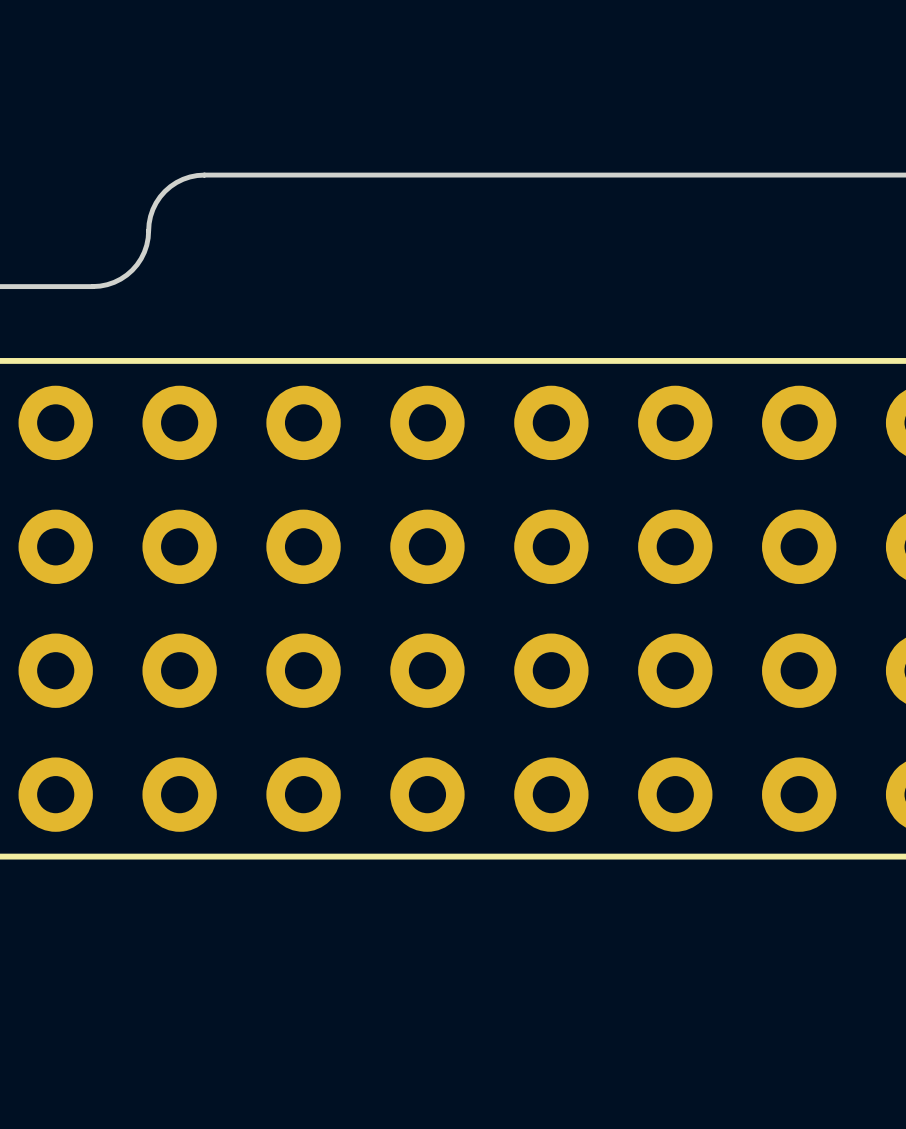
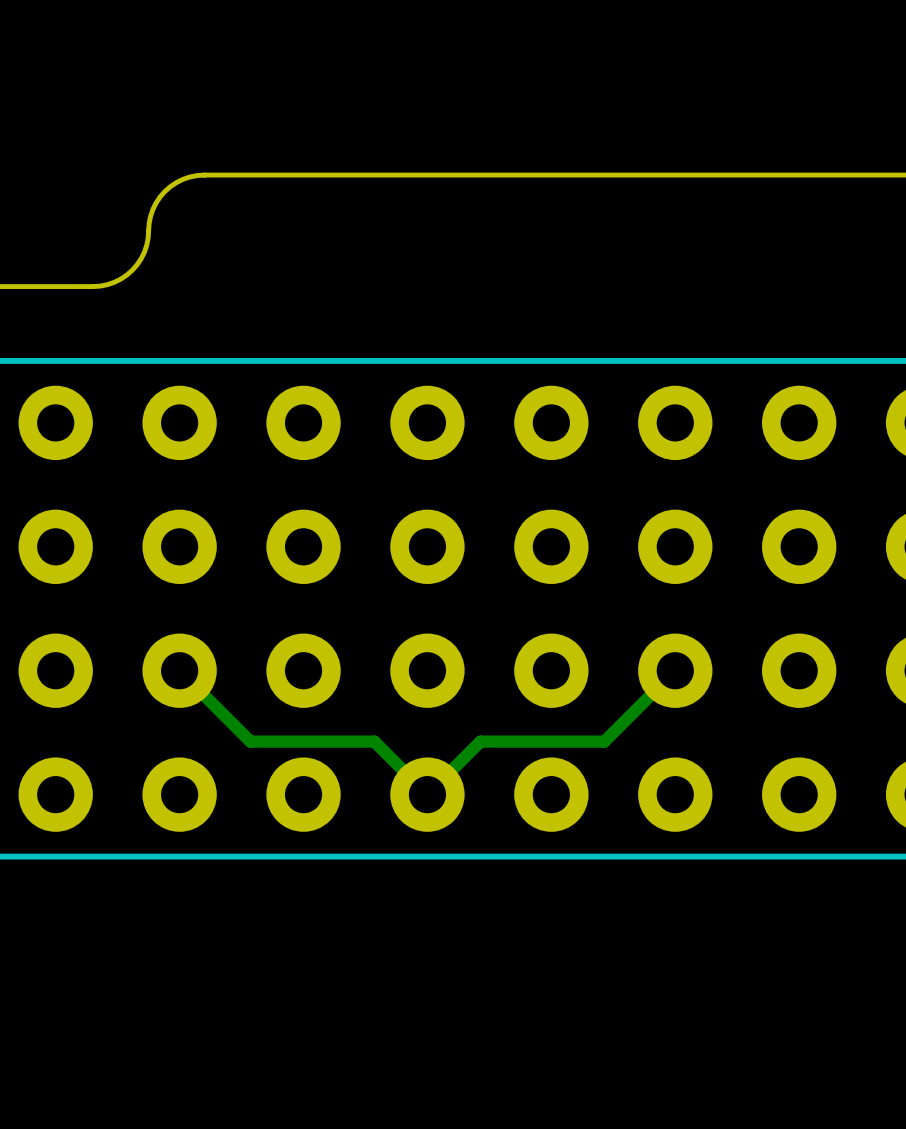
bottom track: none -> (179, 670) (250, 741) (374, 741) (427, 794) (480, 741) (604, 741) (675, 670)

